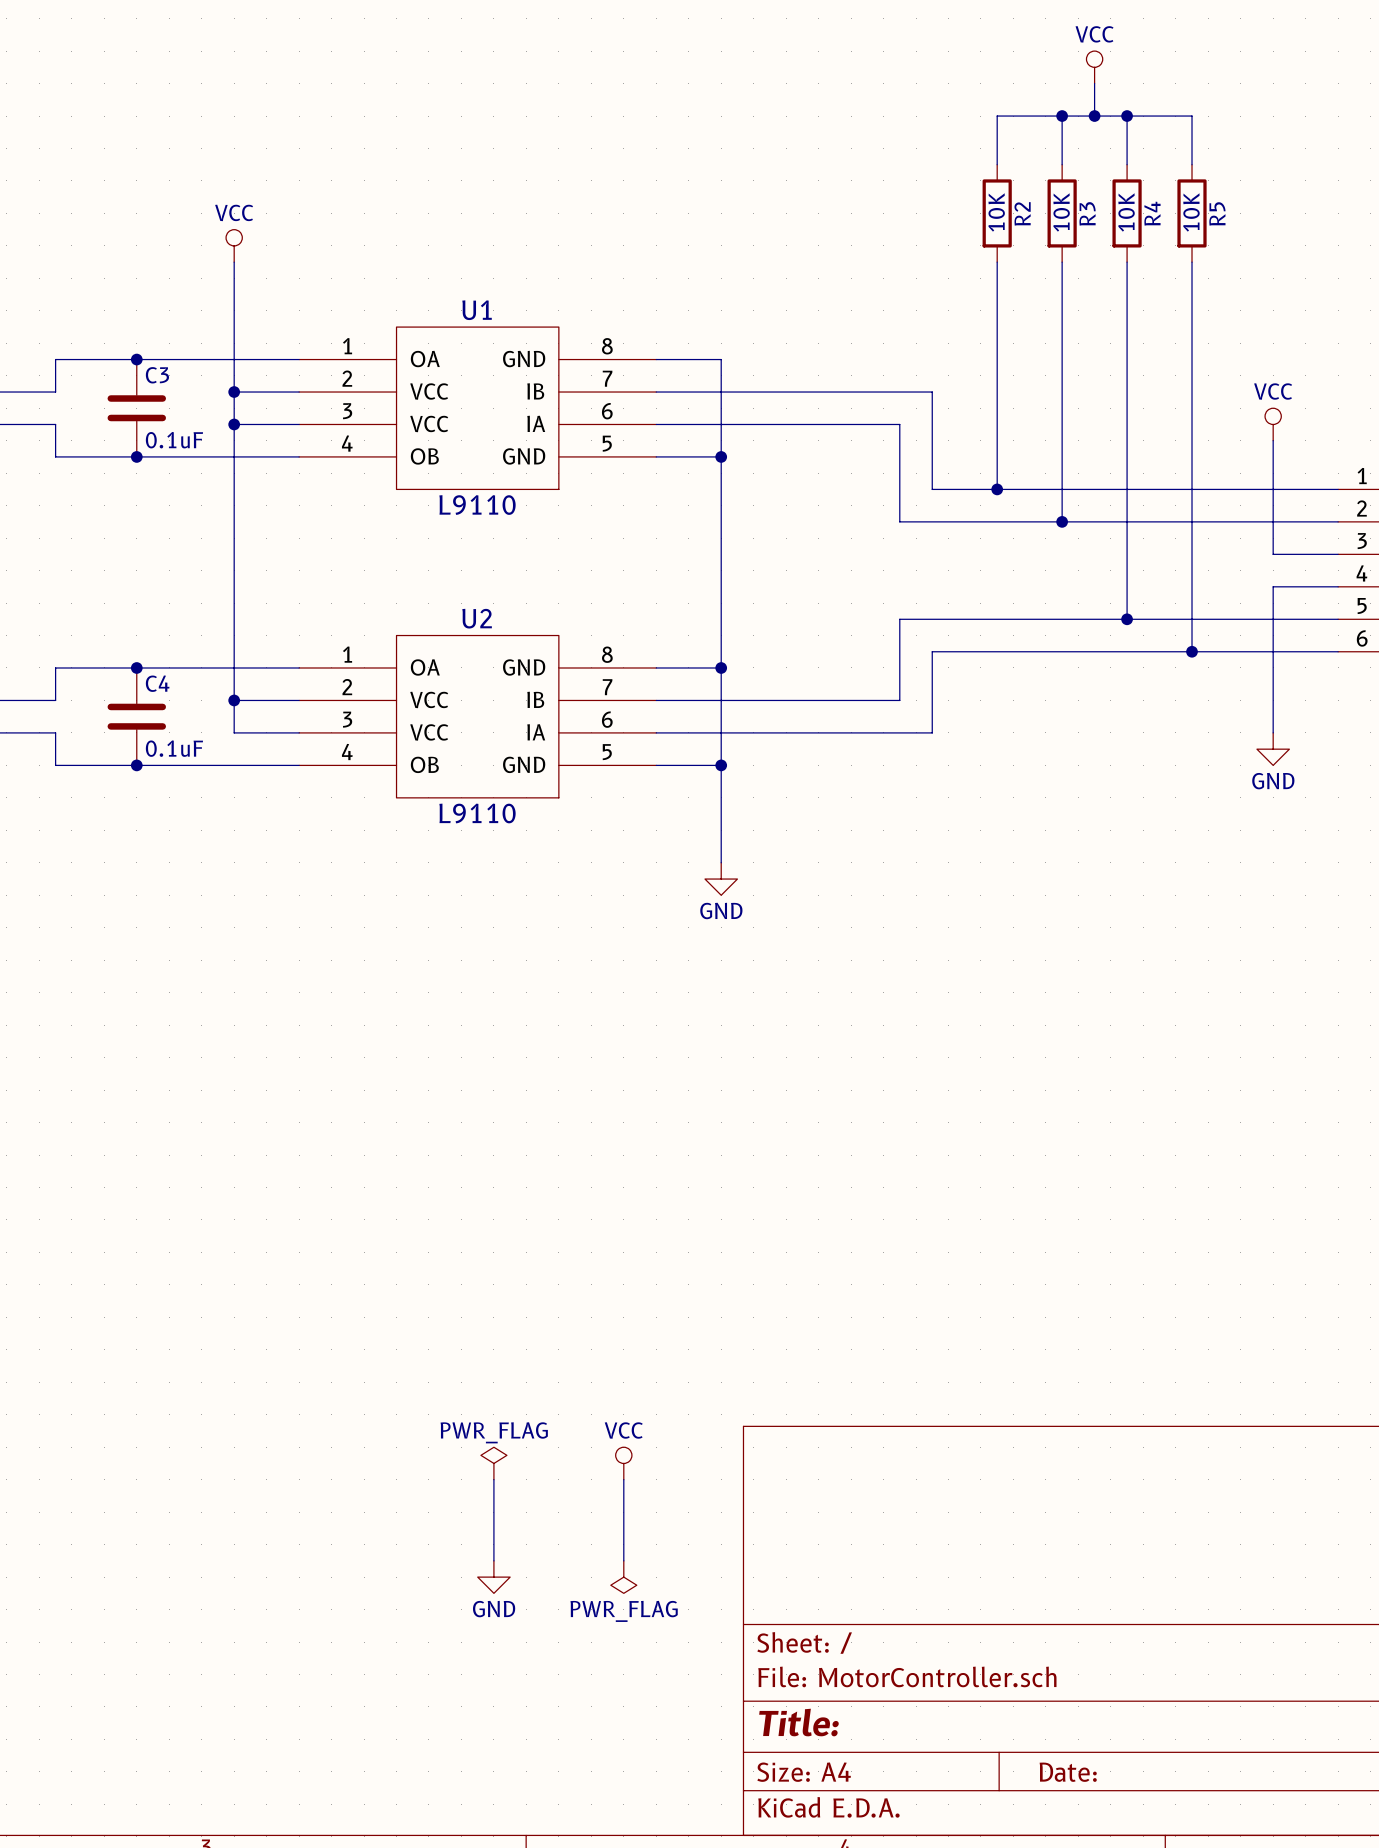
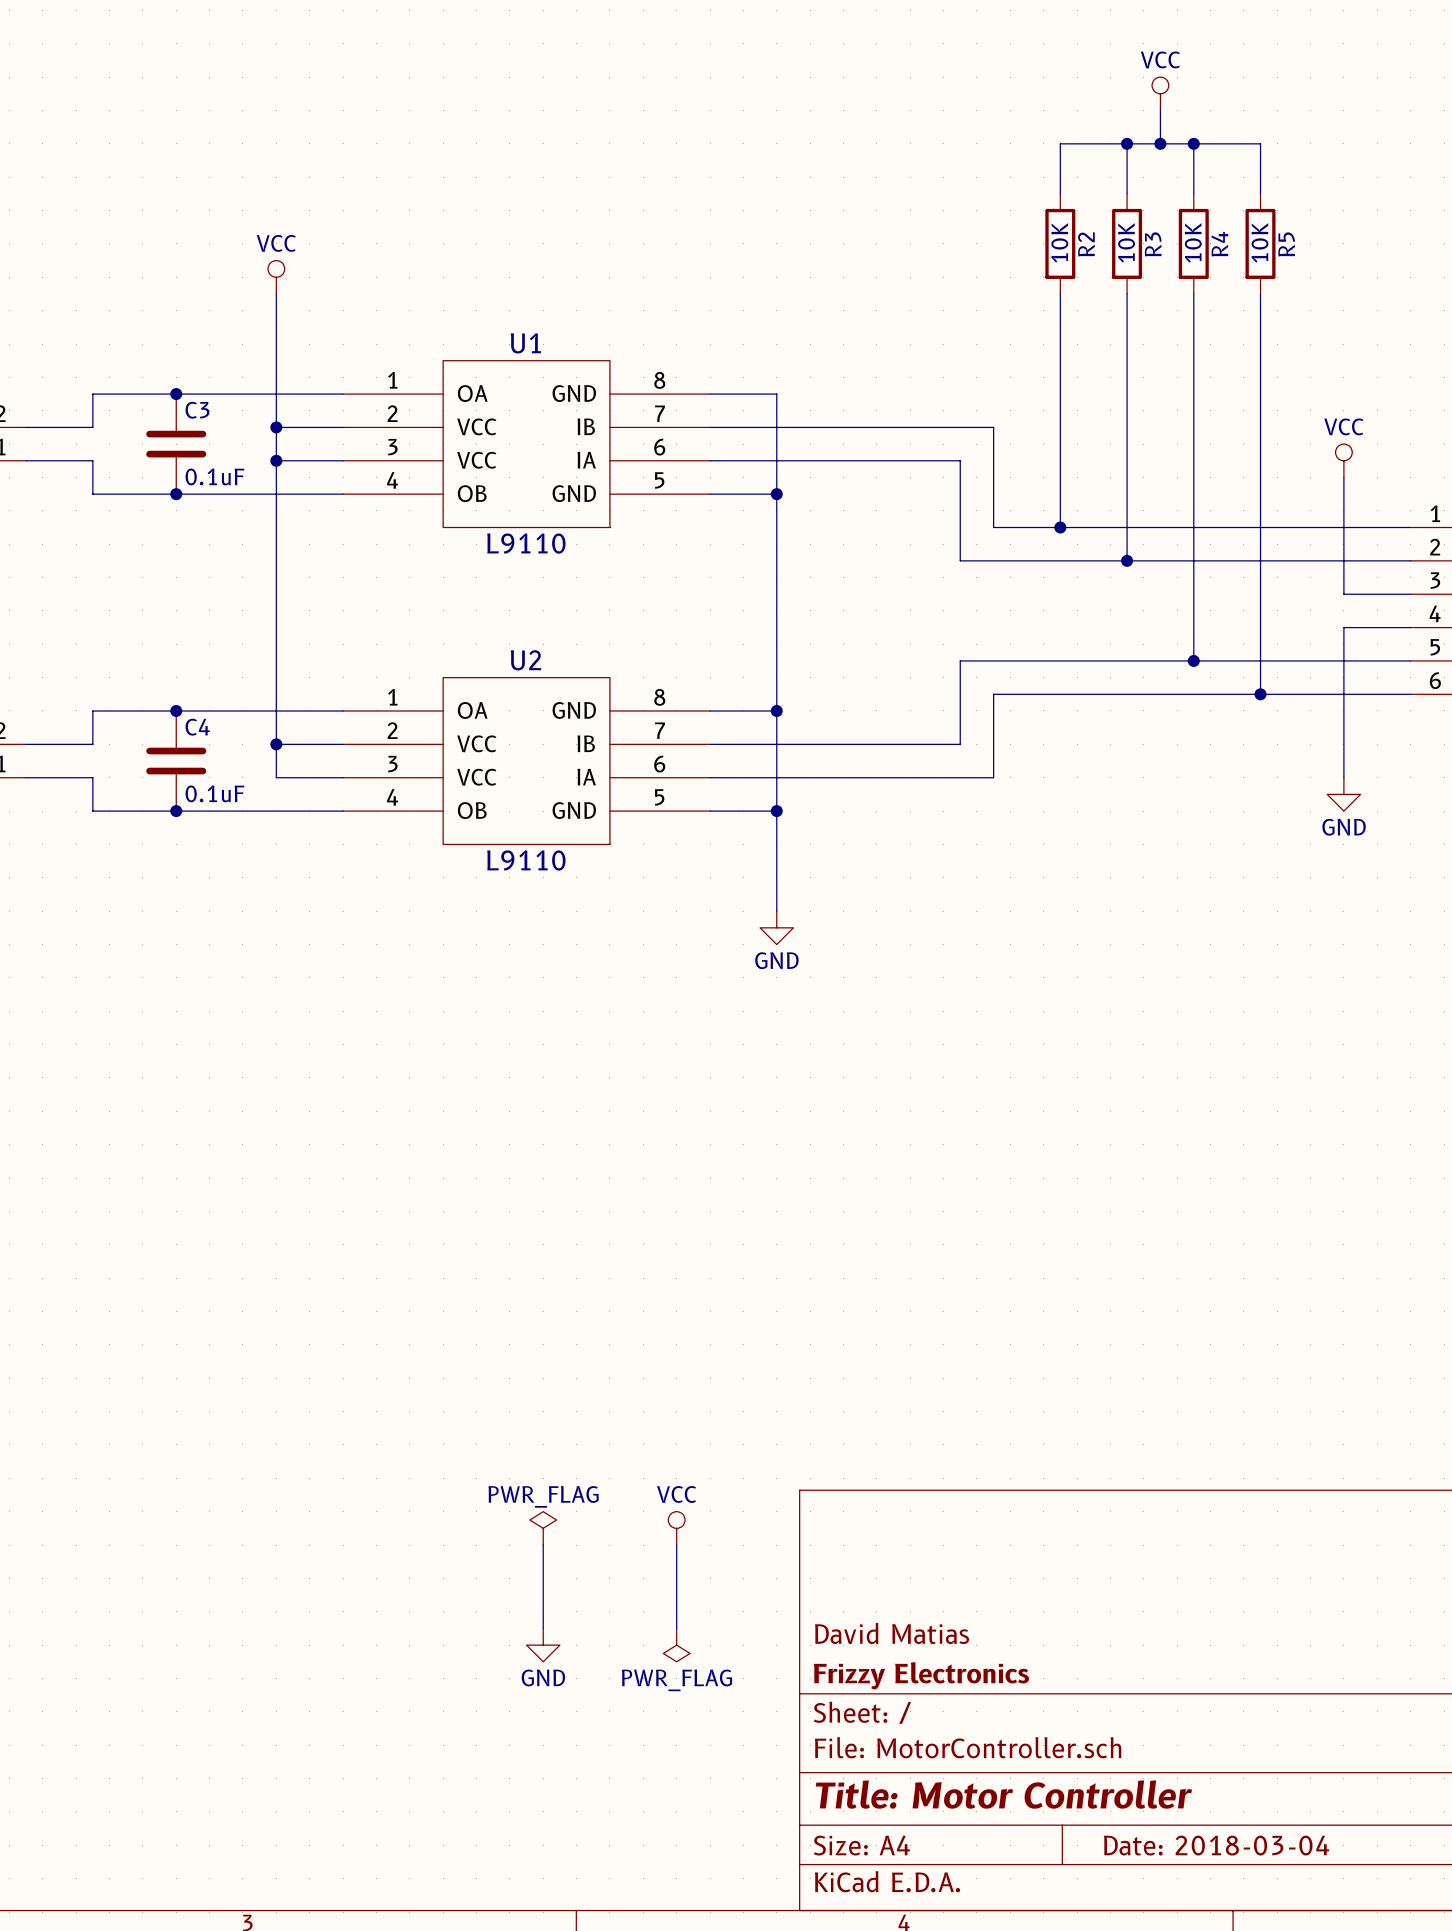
title block: none -> David Matias (892, 1633)
title block: none -> Frizzy Electronics (921, 1675)
title block: Title: (798, 1722) -> Title: Motor Controller (1003, 1794)
title block: Date: (1068, 1772) -> Date: 2018-03-04 (1216, 1845)

